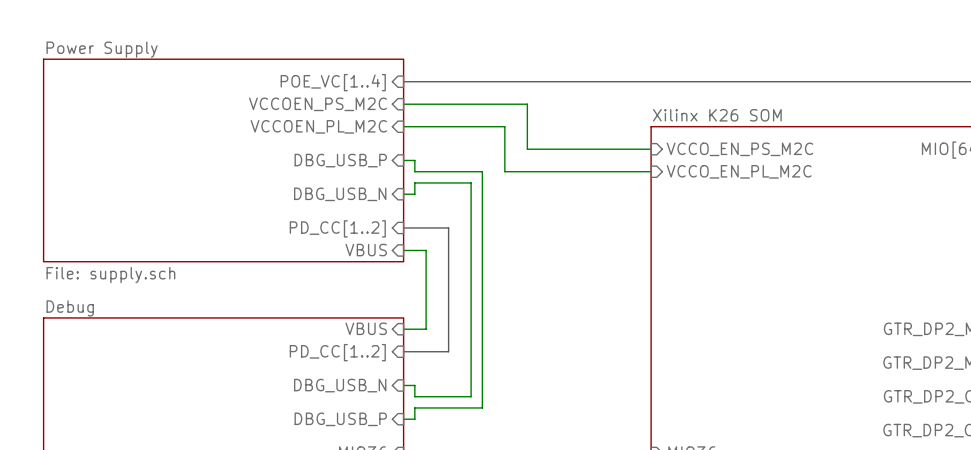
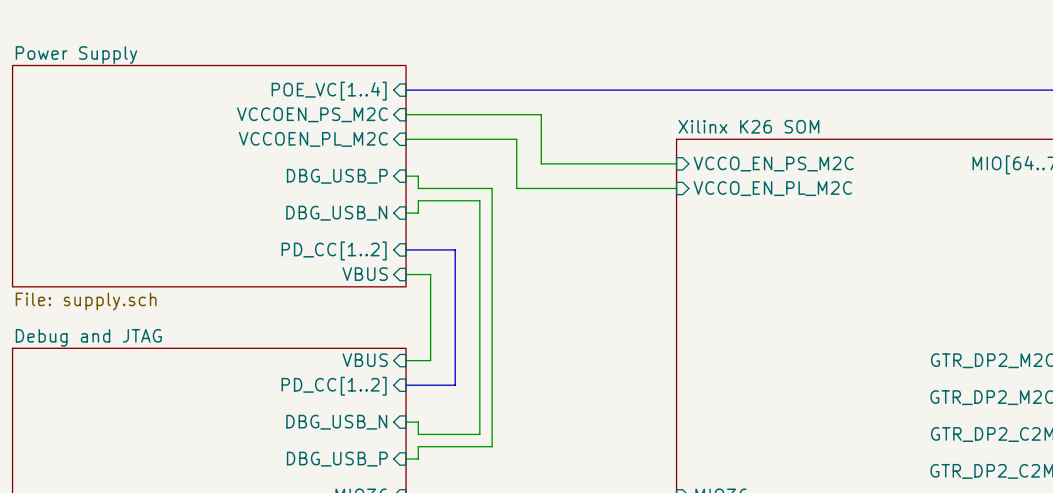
sheet Debug name: Debug (70, 308) -> Debug and JTAG (88, 337)

